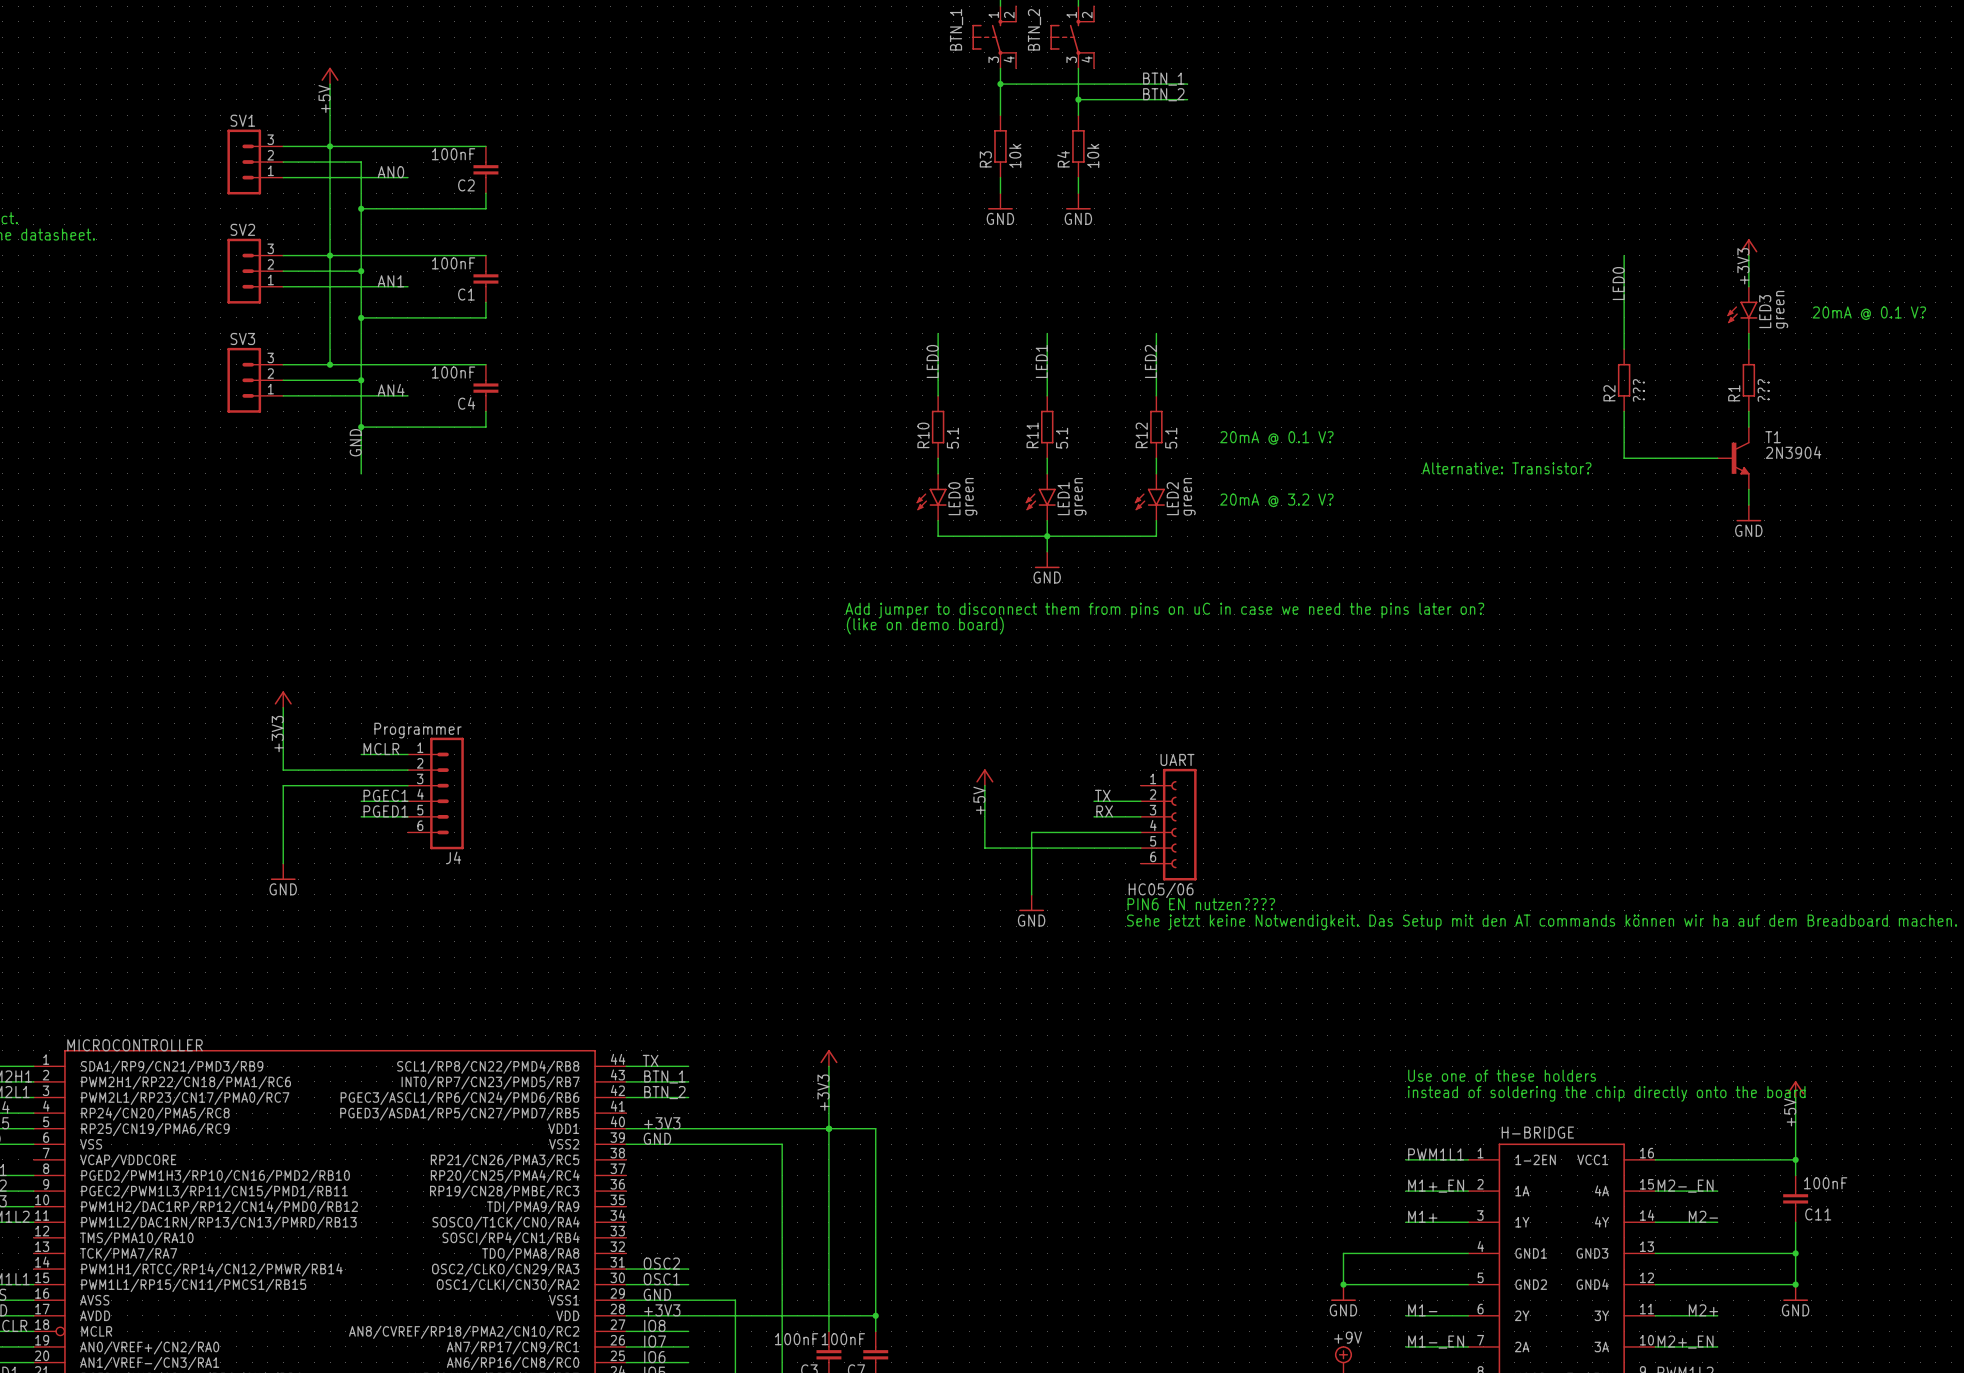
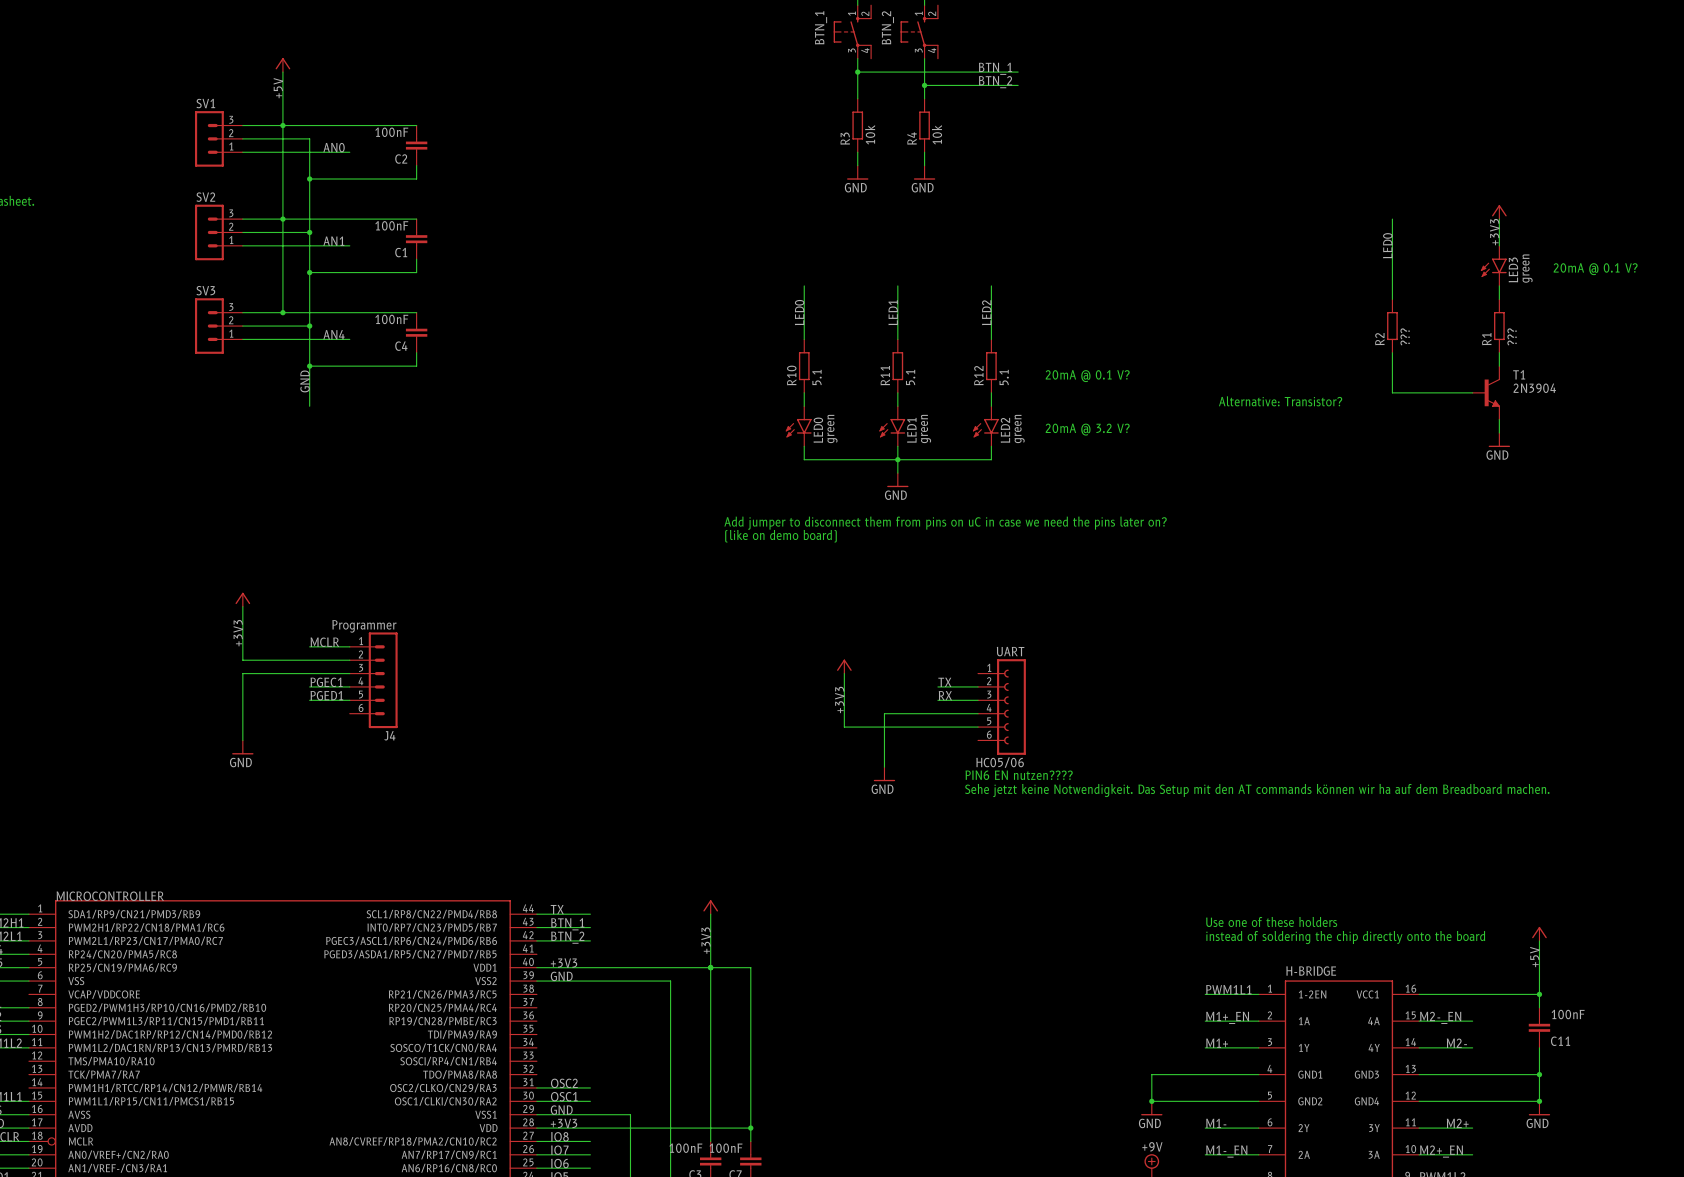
power symbol: +5V (984, 777) -> +3V3 (844, 666)

